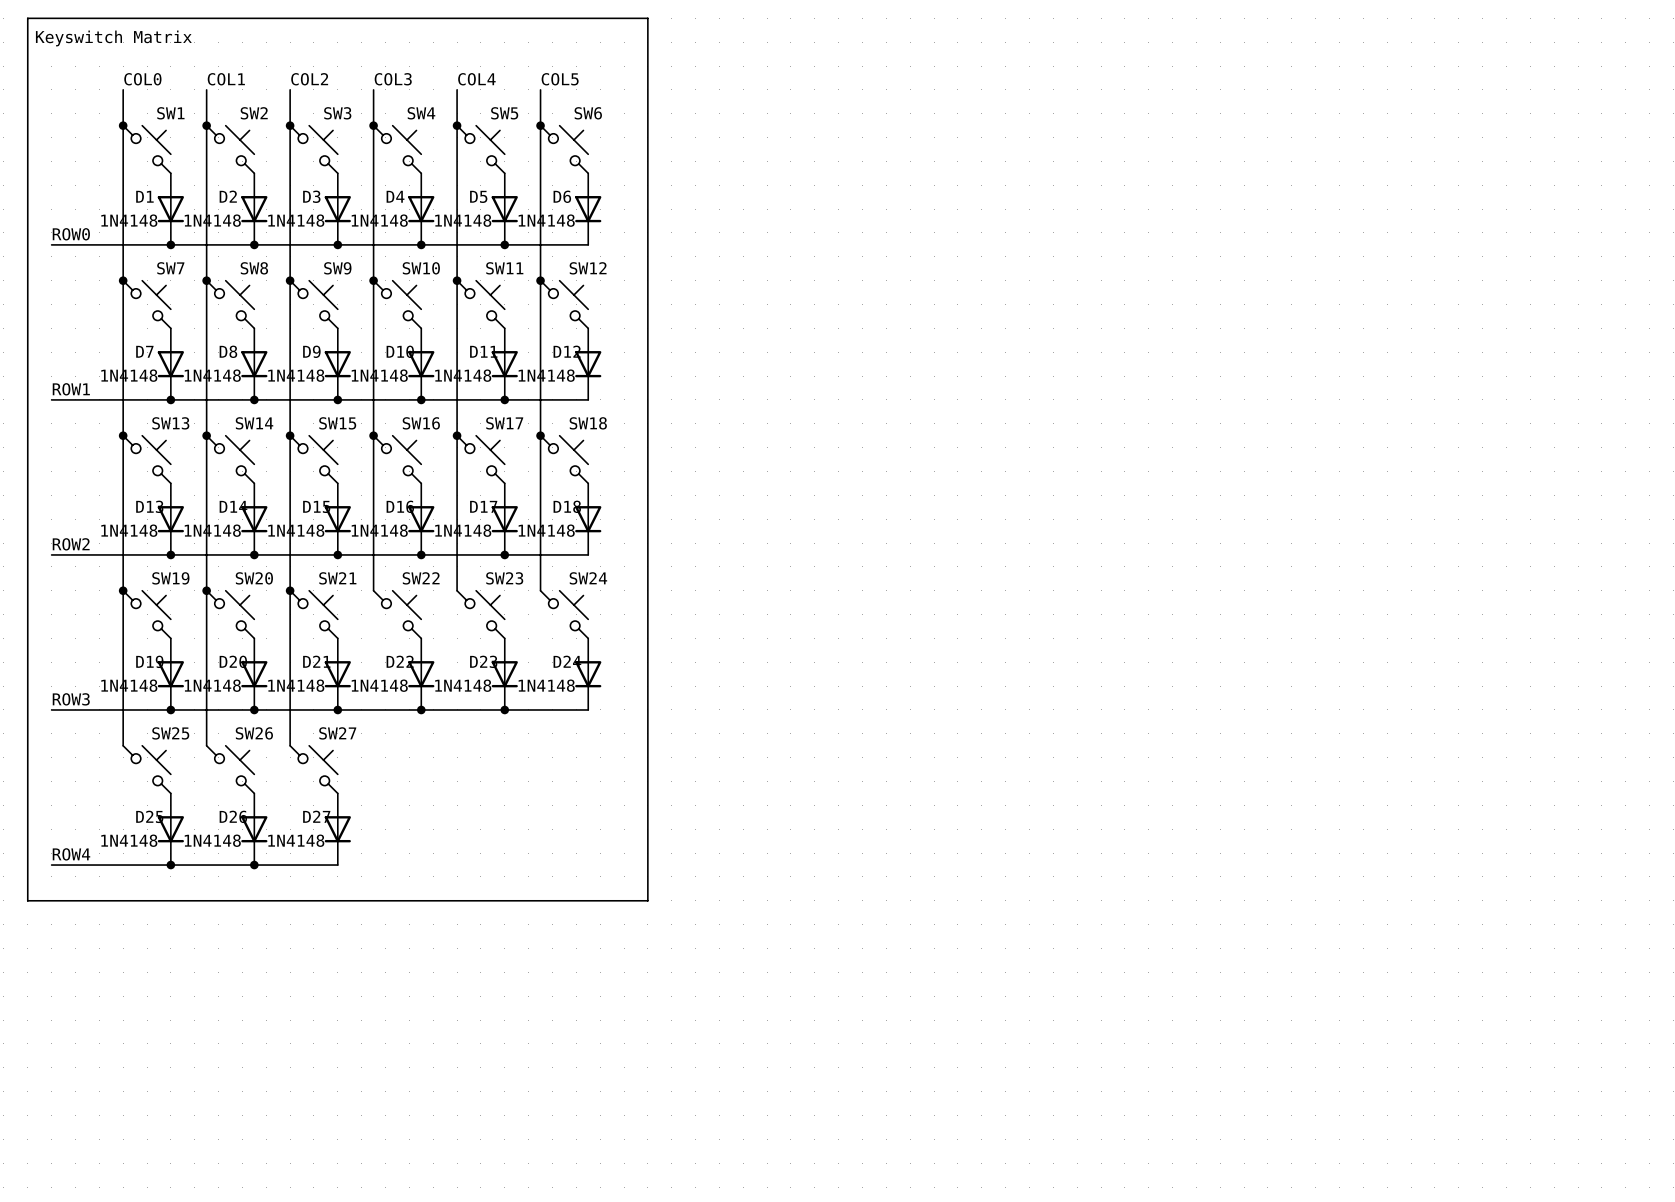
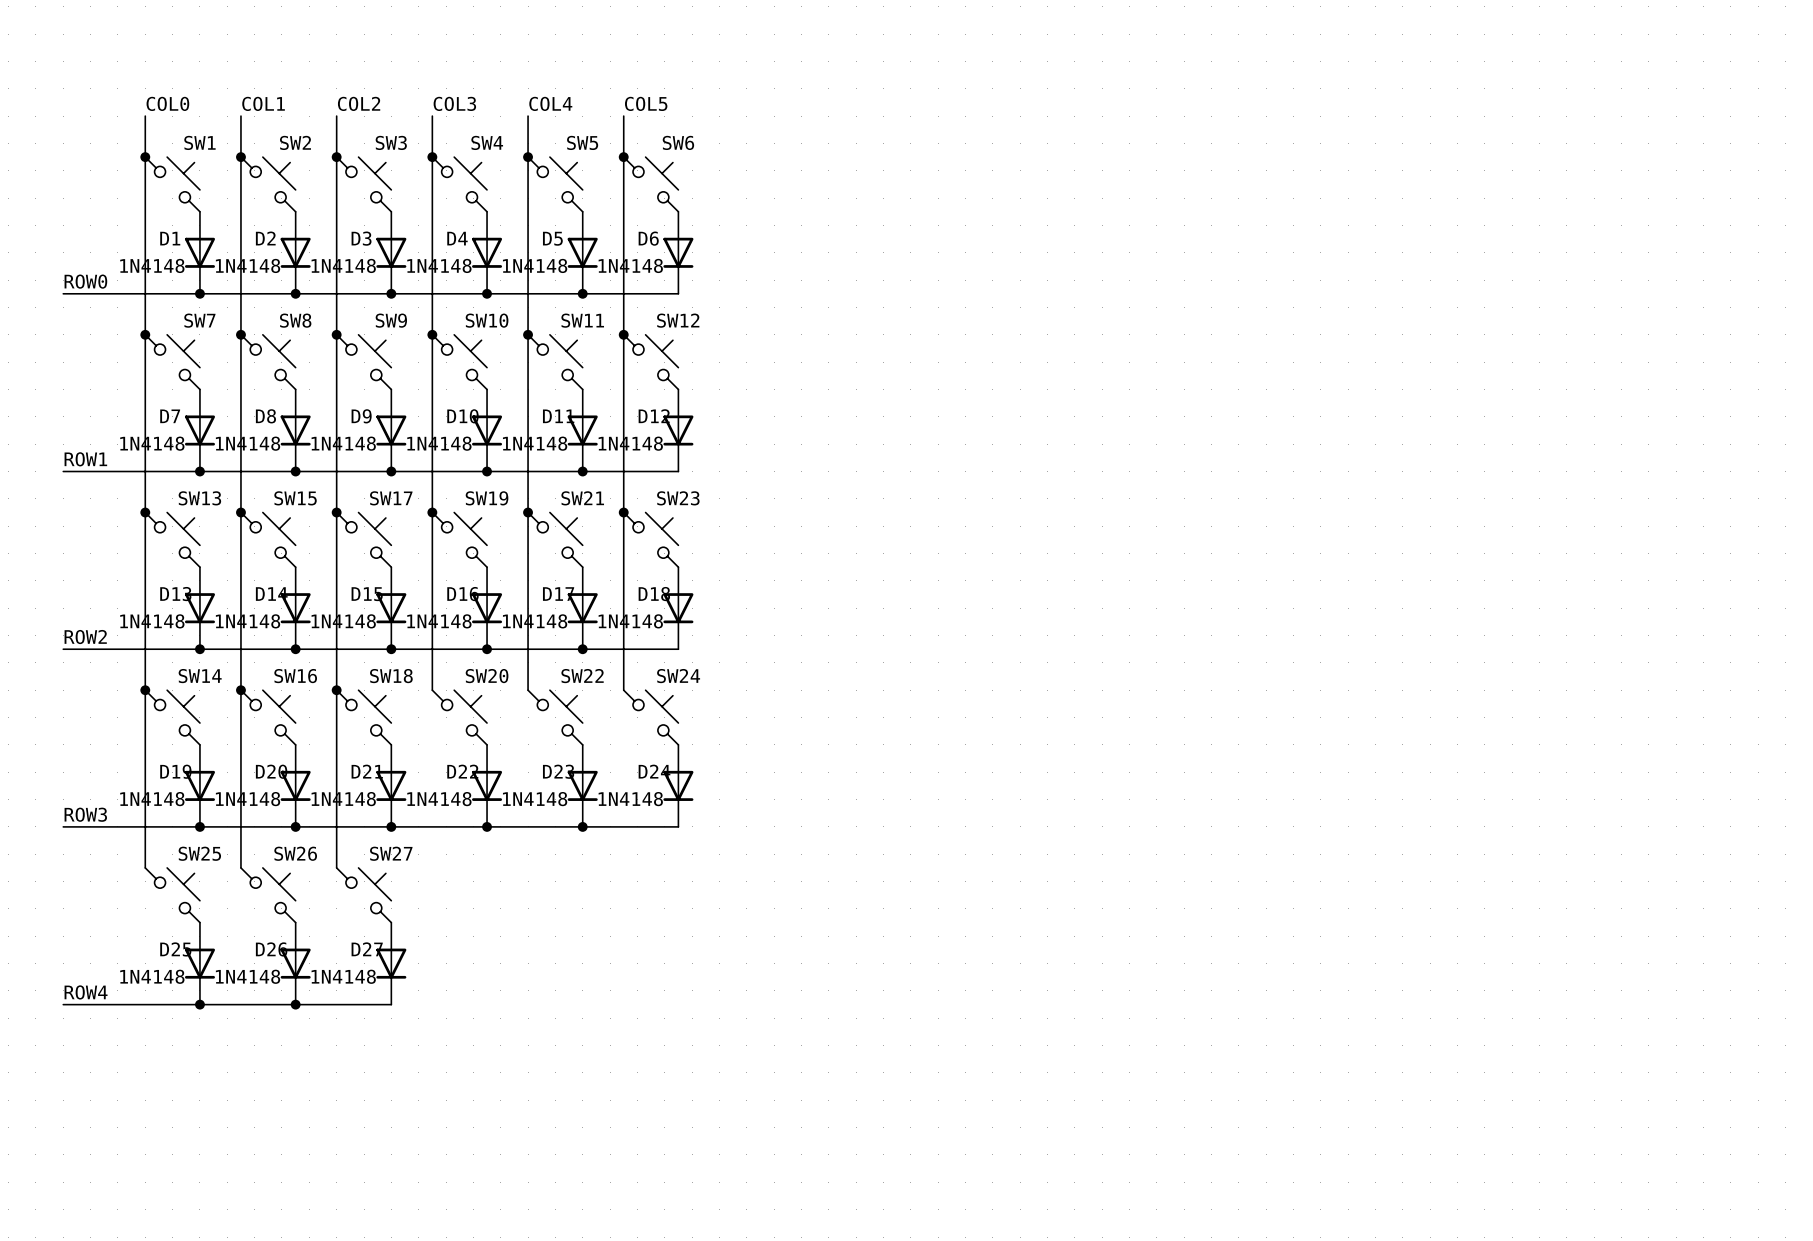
line: (27, 18) (647, 18) (647, 900) (27, 900) (27, 18) -> none
text: Keyswitch Matrix (113, 38) -> none
SW14 name: SW14 (254, 423) -> SW15 (295, 498)
SW15 name: SW15 (337, 423) -> SW17 (391, 498)
SW16 name: SW16 (421, 423) -> SW19 (487, 498)
SW17 name: SW17 (504, 423) -> SW21 (582, 498)
SW18 name: SW18 (588, 423) -> SW23 (678, 498)
SW19 name: SW19 (170, 578) -> SW14 (200, 676)
SW20 name: SW20 (254, 578) -> SW16 (295, 676)
SW21 name: SW21 (337, 578) -> SW18 (391, 676)
SW22 name: SW22 (421, 578) -> SW20 (487, 676)
SW23 name: SW23 (504, 578) -> SW22 (582, 676)

